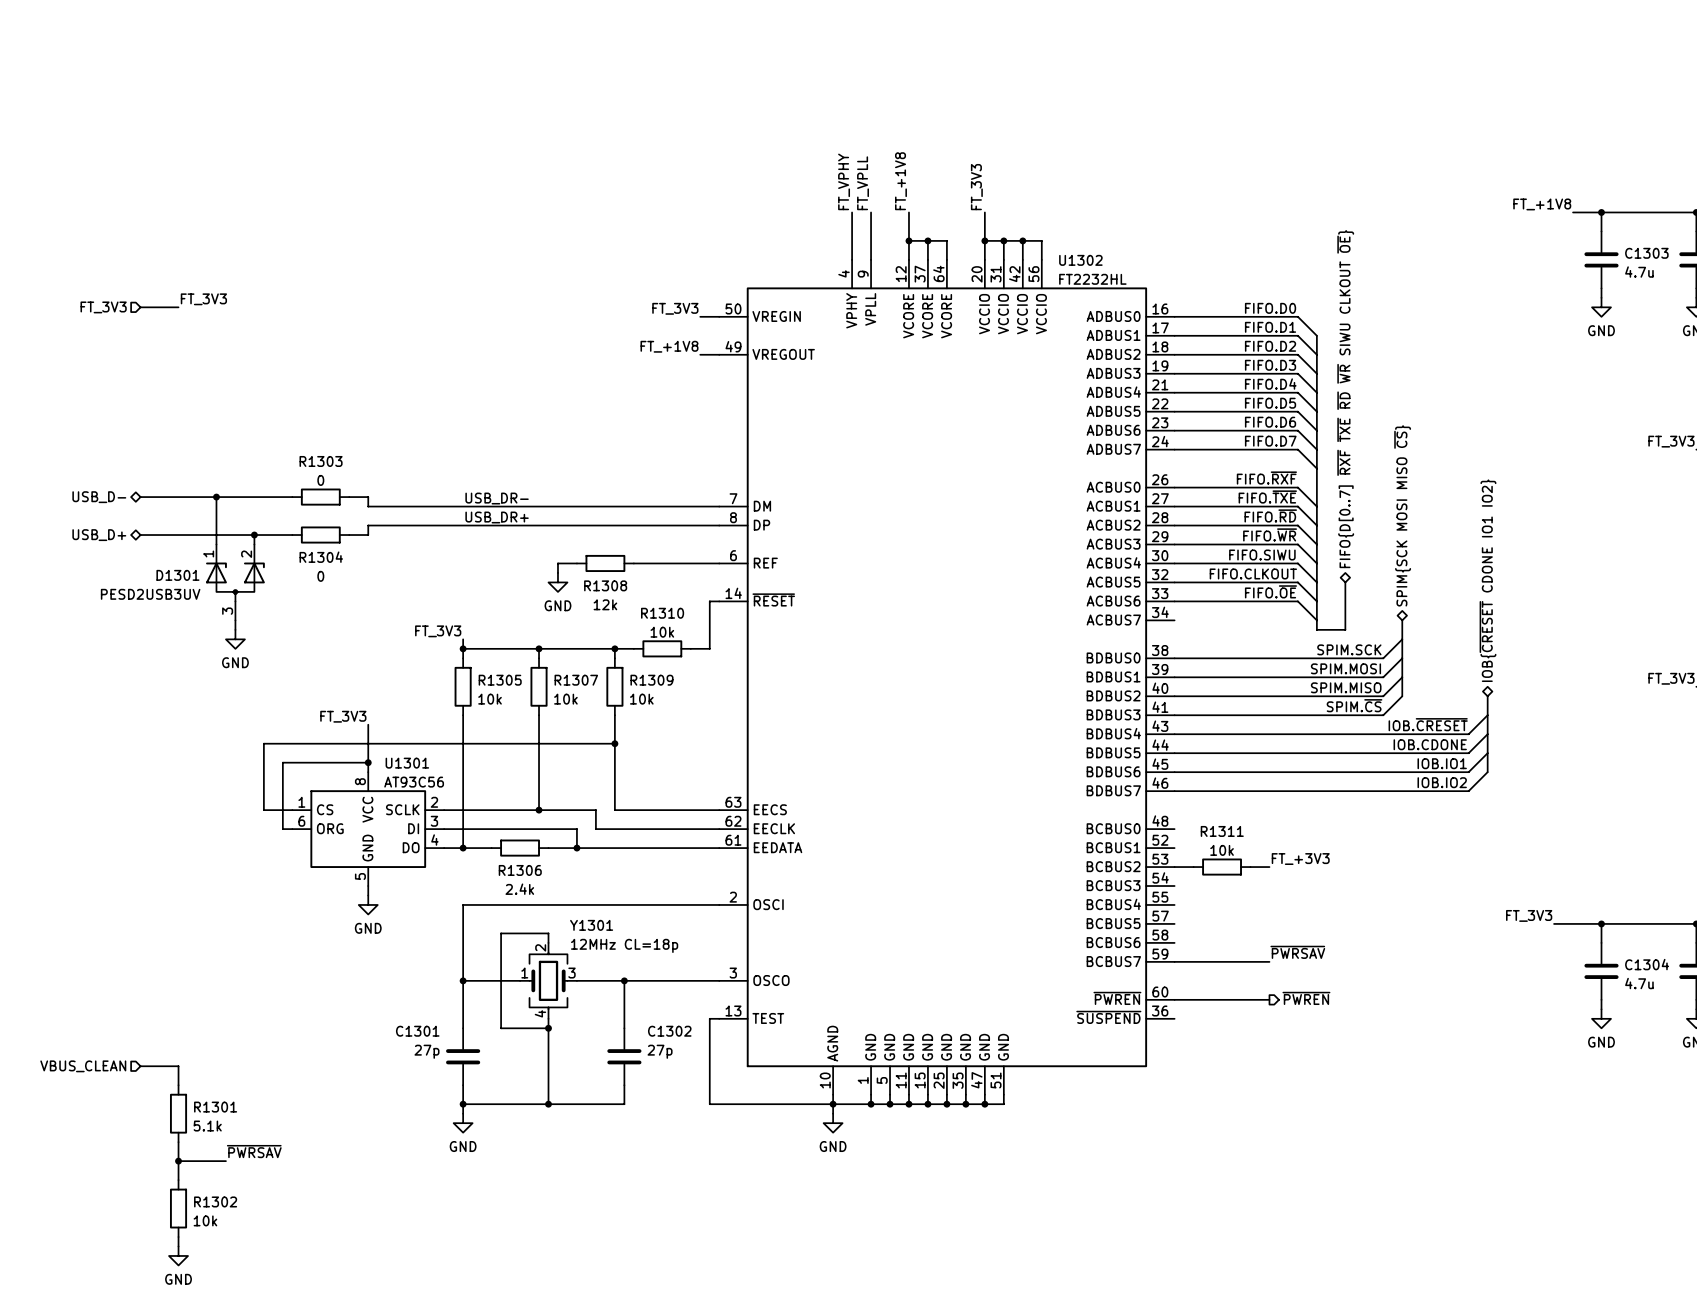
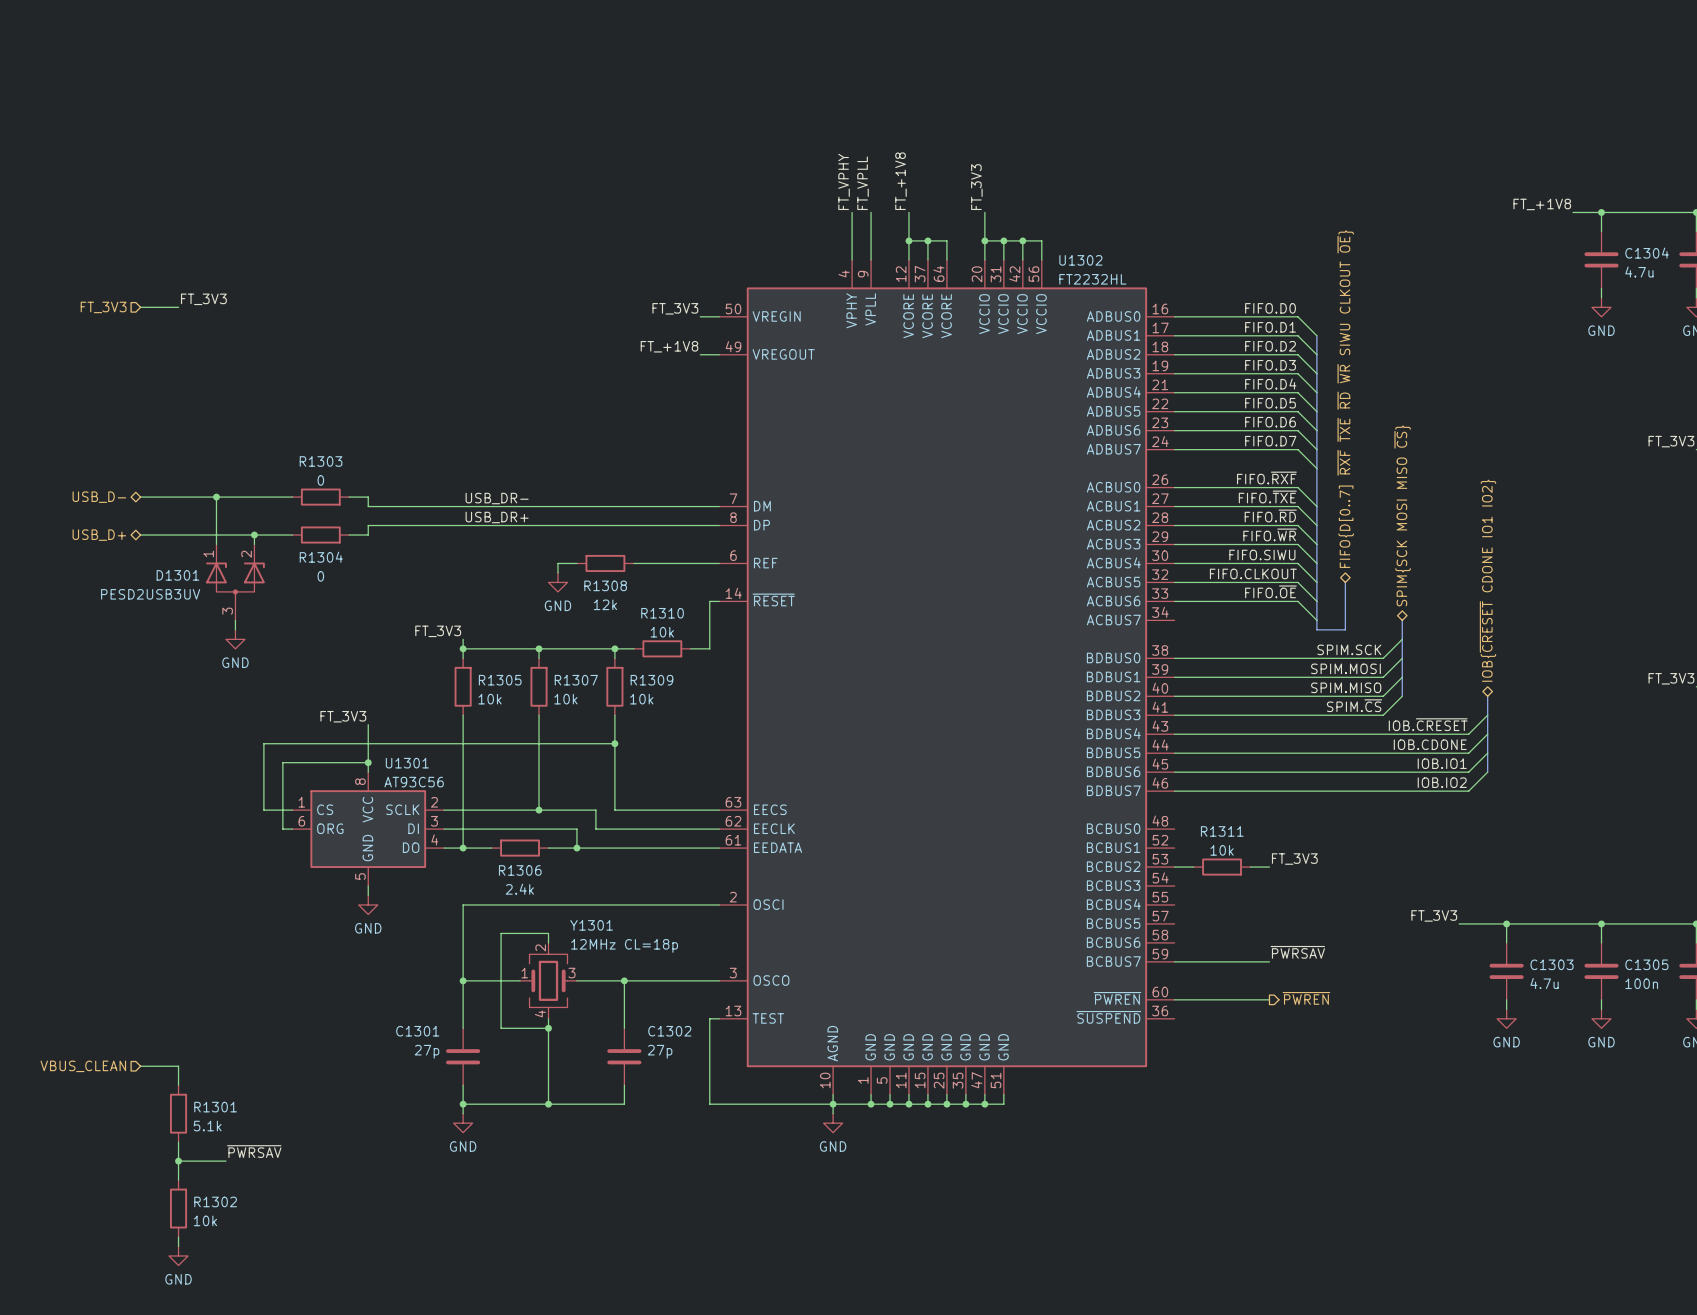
C1303 name: C1303 (1646, 253) -> C1304 (1647, 253)
label: FT_+3V3 (1300, 859) -> FT_3V3 (1294, 859)
label position: FT_3V3 (1529, 915) -> FT_3V3 (1434, 915)
wire: none -> (1459, 923) (1554, 923)
wire: none -> (1506, 923) (1506, 942)
junction: none -> (1506, 923)
C1304 name: C1304 (1647, 964) -> C1305 (1646, 964)
C1303: none -> 4.7u (1506, 971)
C1304 value: 4.7u (1639, 983) -> 100n (1641, 983)
wire: none -> (1506, 999) (1506, 1009)
power symbol: none -> GND (1506, 1018)

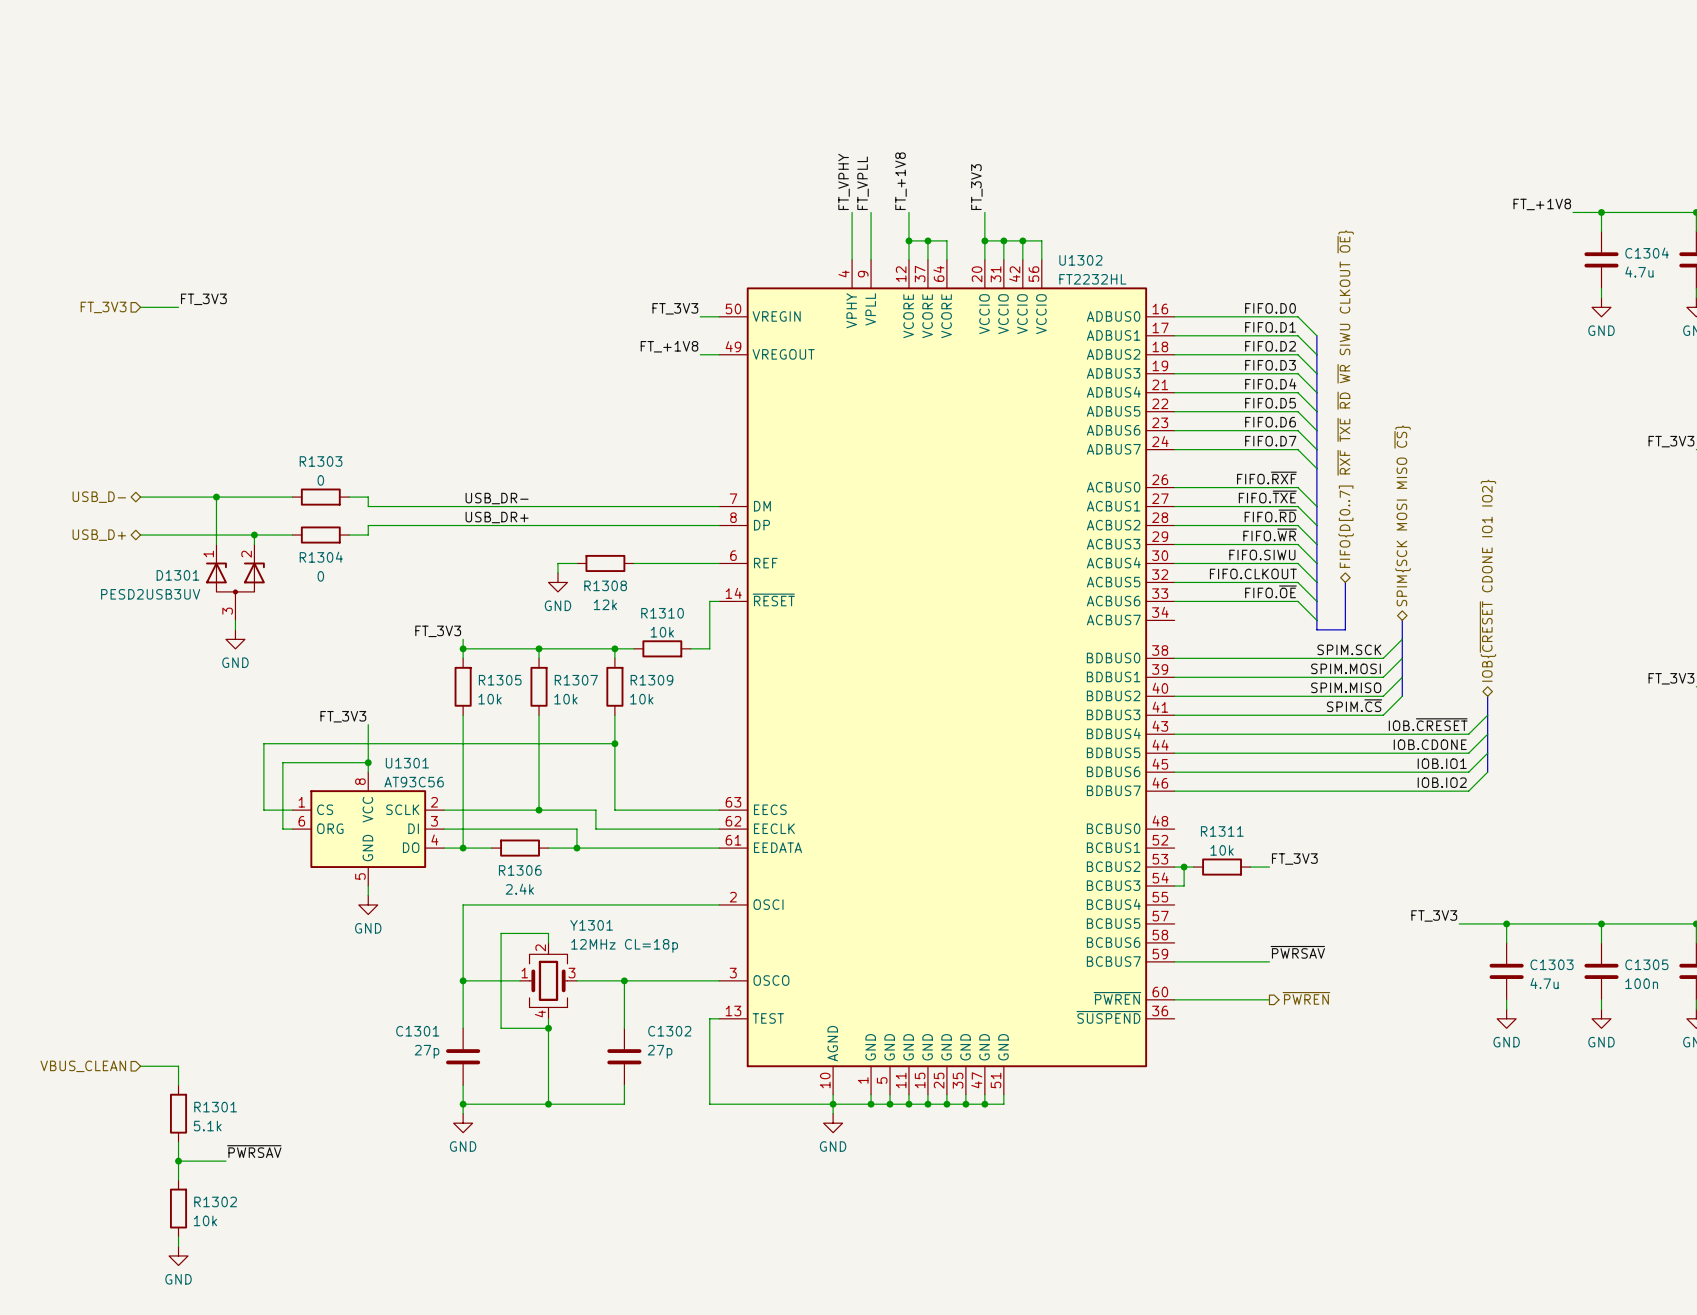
wire: none -> (1184, 867) (1184, 886) (1174, 886)
junction: none -> (1184, 867)

